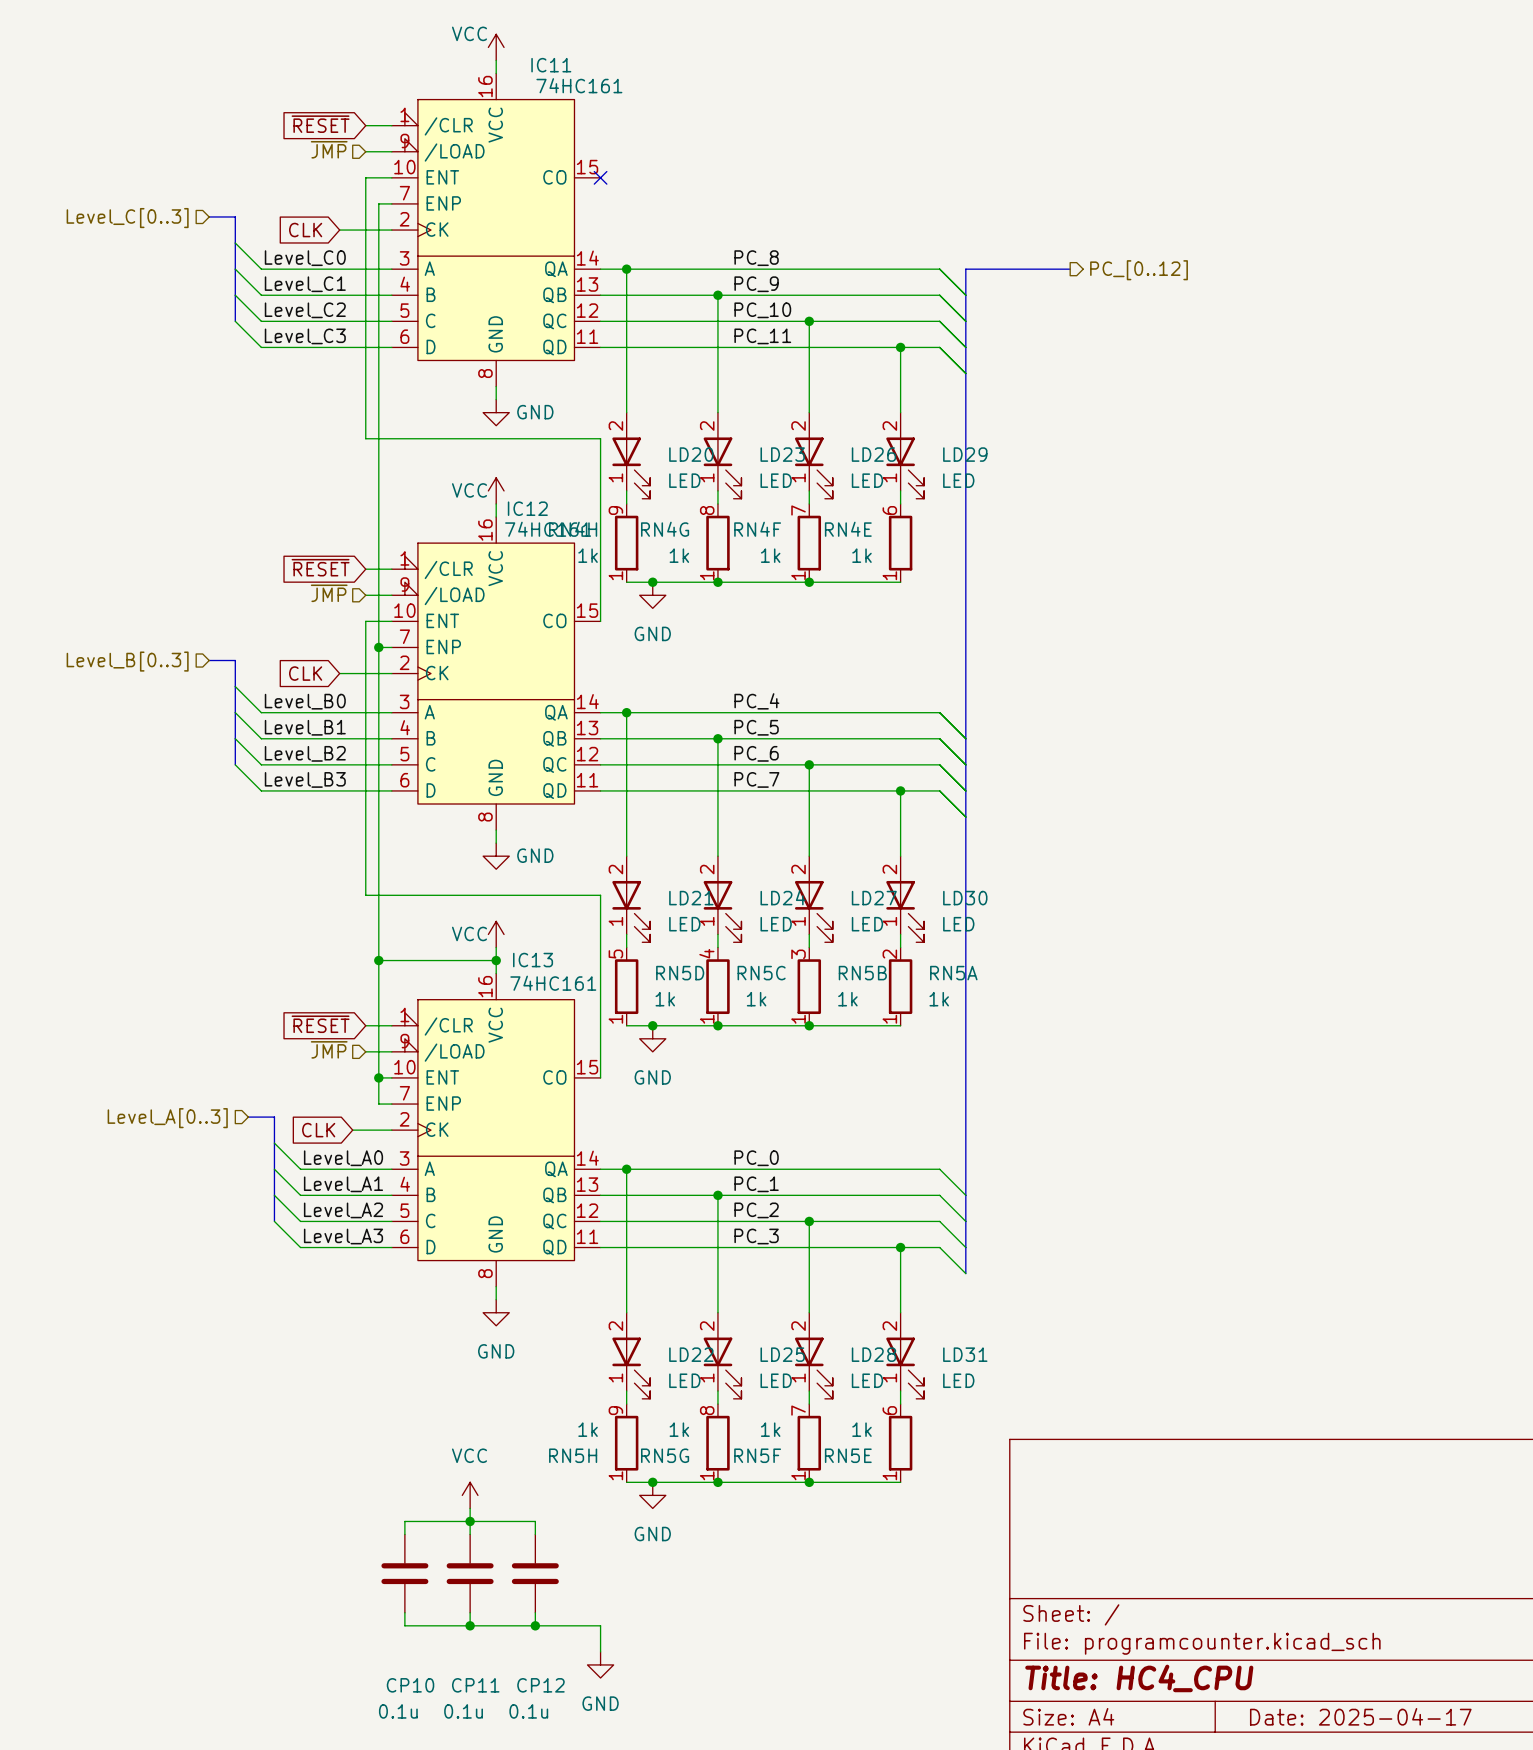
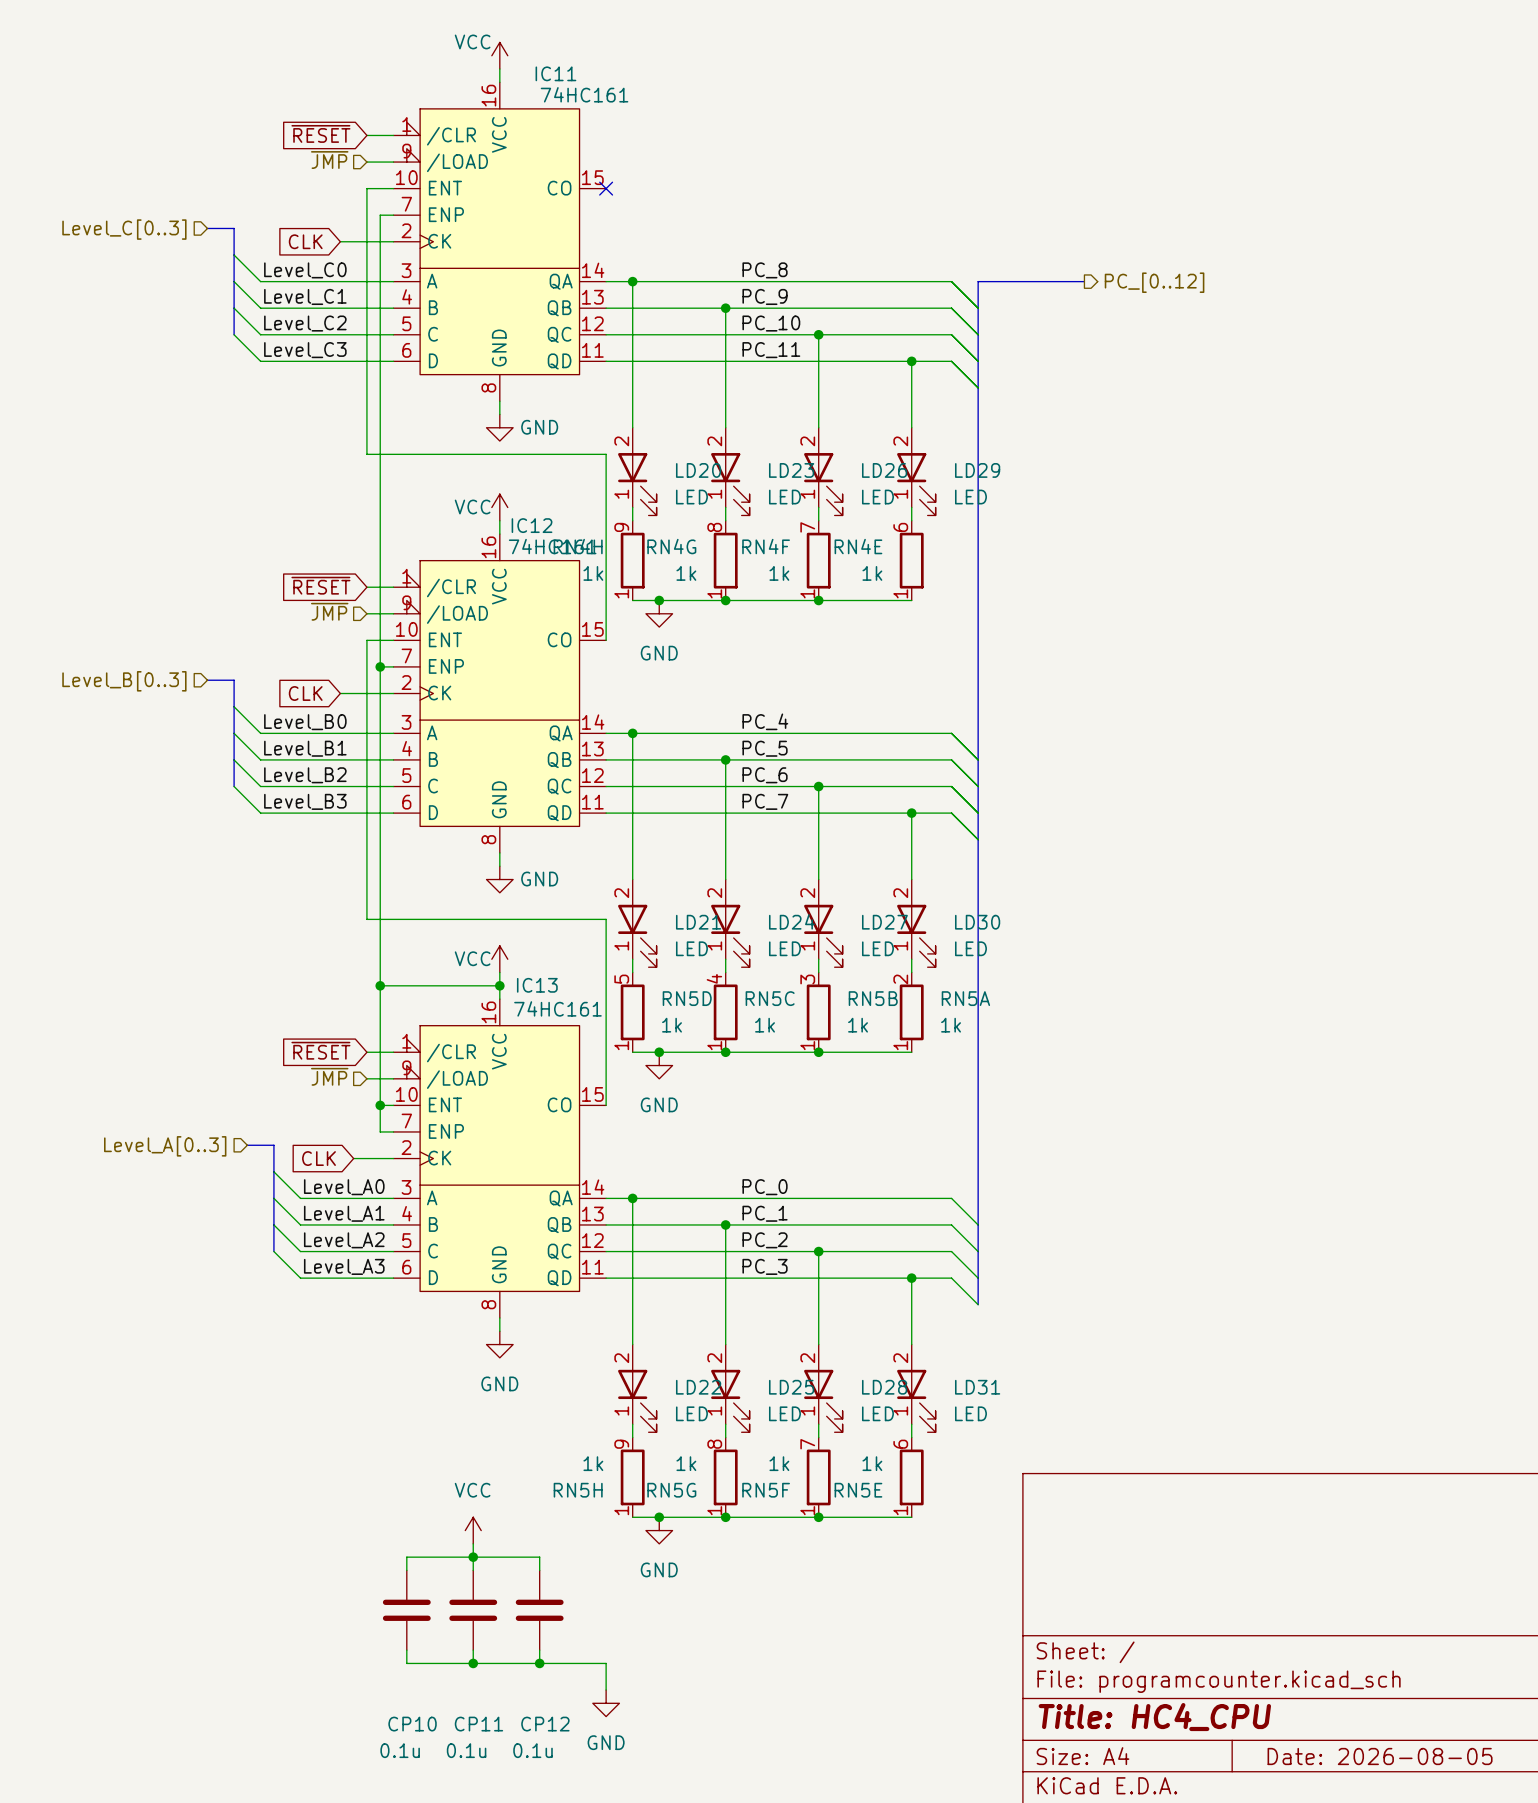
title block: Date: 2025-04-17 (1360, 1716) -> Date: 2026-08-05 (1380, 1756)

